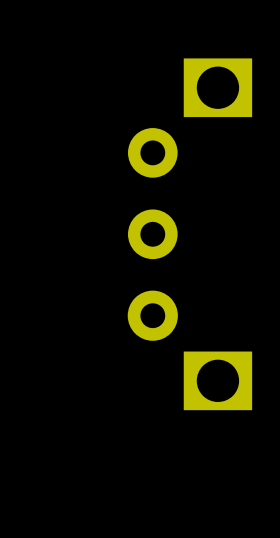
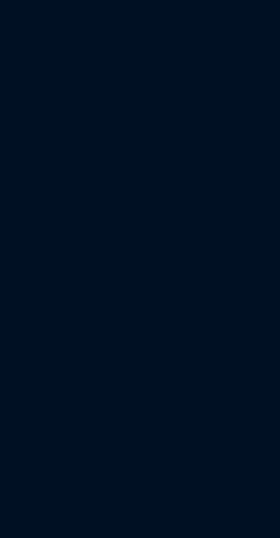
part: (189, 234) -> none

